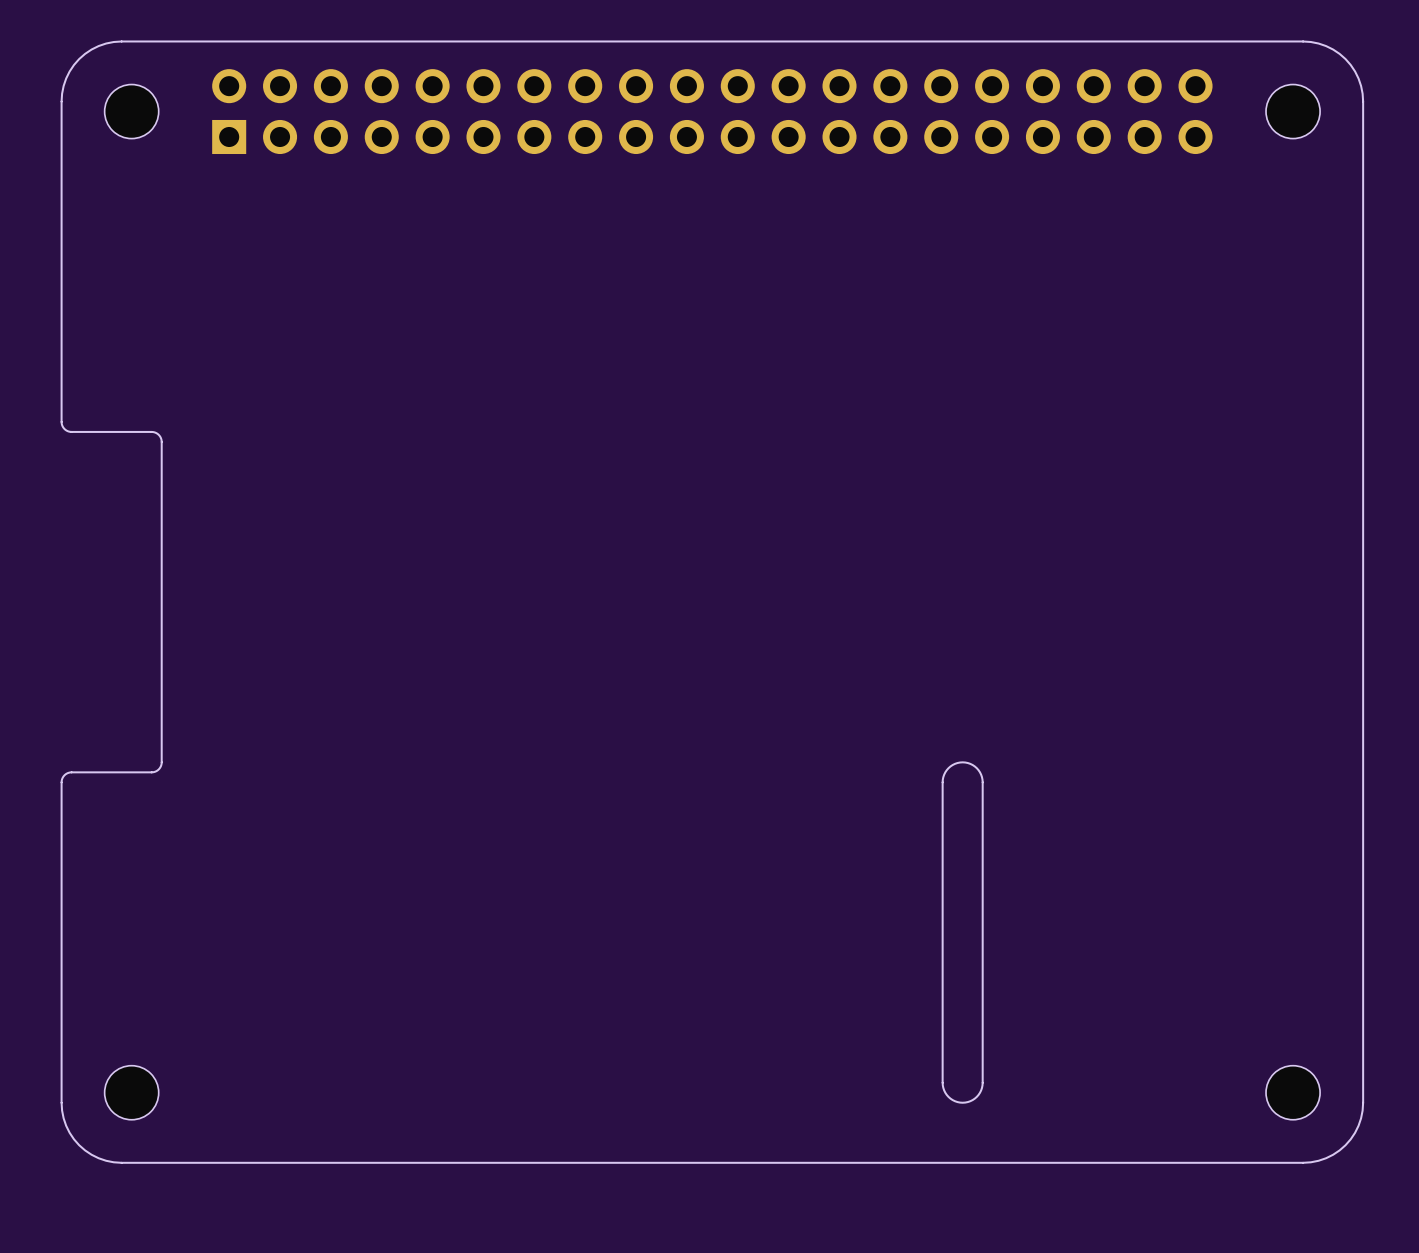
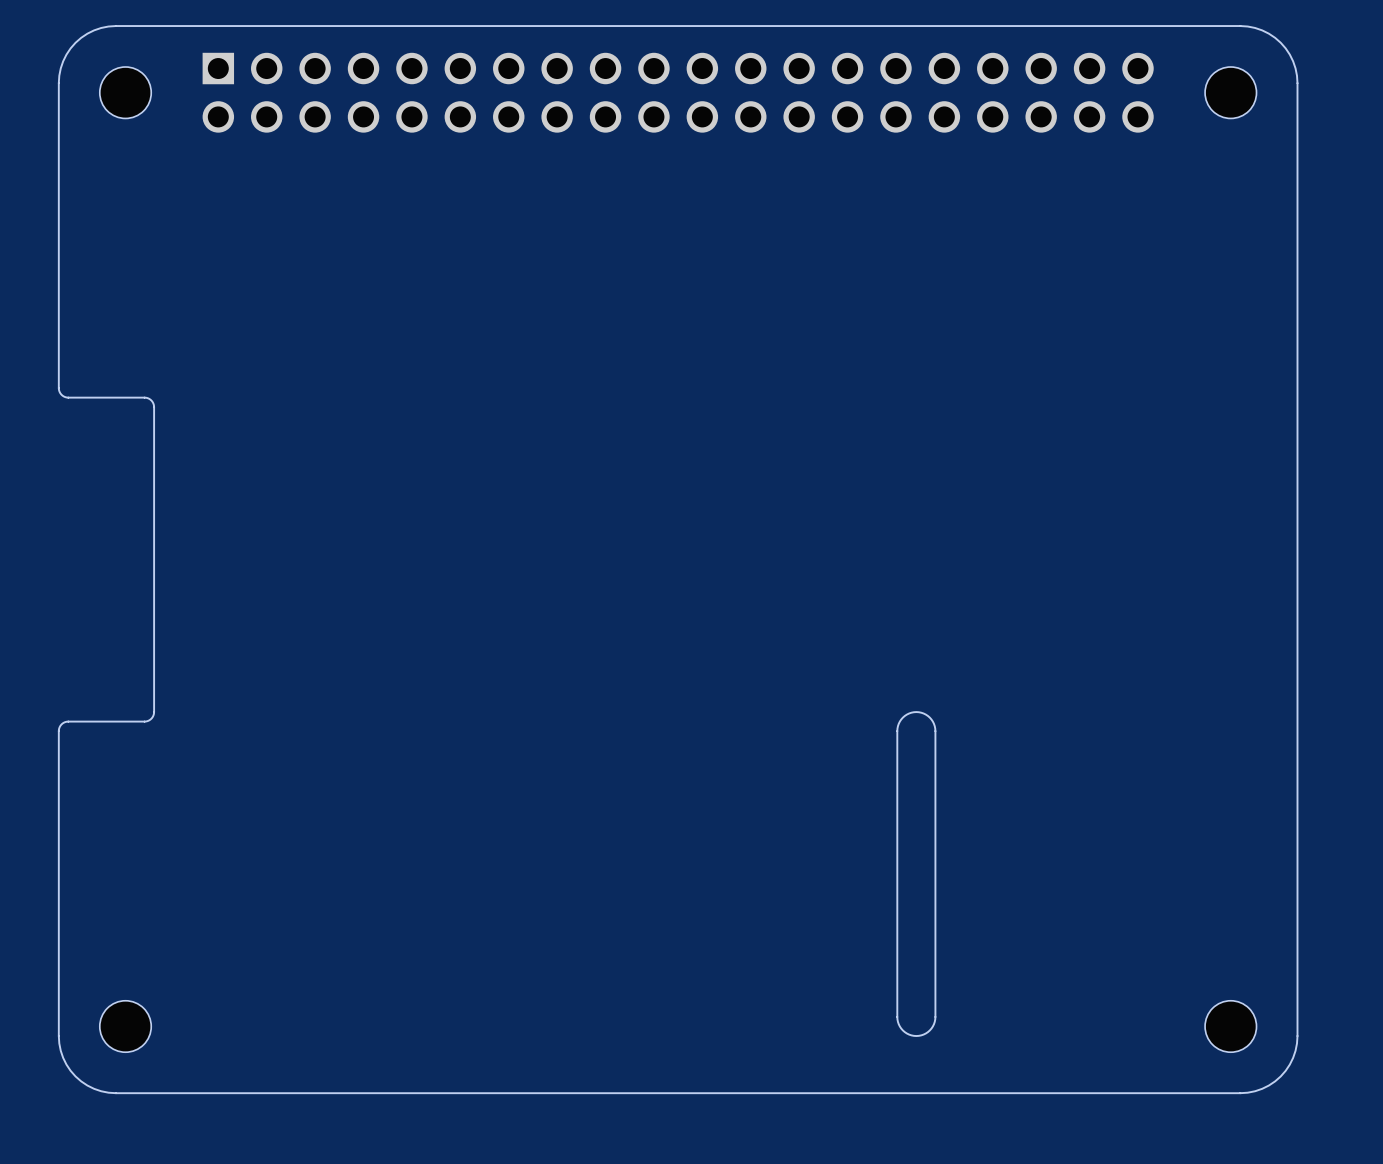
part footprint: [212, 69, 1213, 155] -> [202, 52, 1154, 133]

